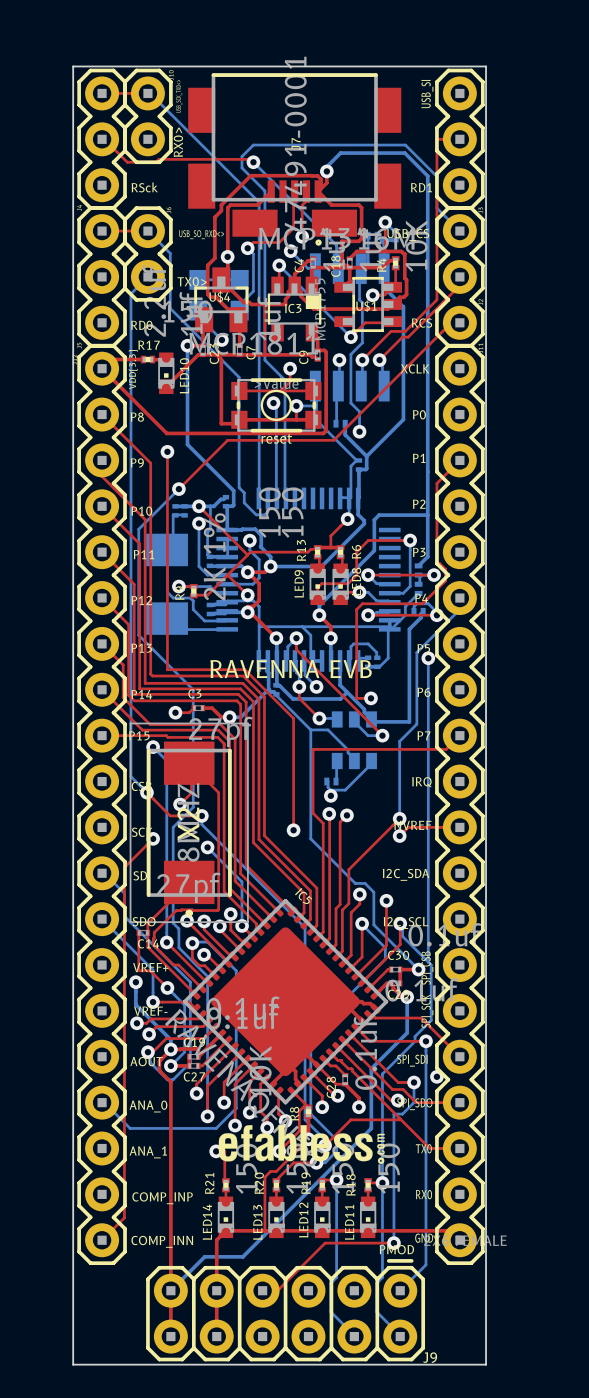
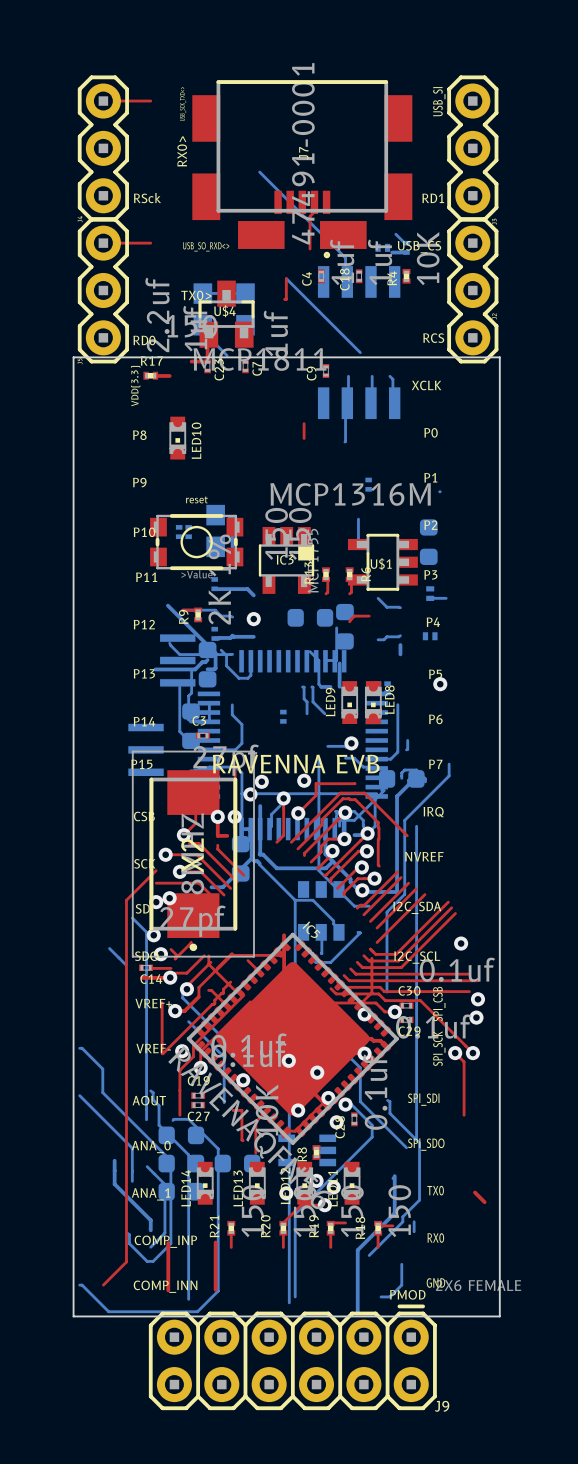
bottom track: (147, 93) (150, 93) (259, 202) (258, 498) -> none
part: (147, 116) -> none
top track: (102, 139) (104, 139) (127, 162) (155, 162) (158, 159) (250, 159) (253, 162) -> none
top track: (459, 139) (436, 139) (436, 299) (405, 331) (391, 331) (362, 360) -> none
via: (253, 162) -> none
top track: (326, 171) (326, 182) (318, 191) (331, 205) (358, 205) (361, 207) (361, 238) (358, 241) (342, 241) (342, 262) (349, 267) (349, 281) (343, 287) -> none
bottom track: (326, 171) (326, 166) (340, 153) (404, 153) (427, 176) (427, 556) (418, 565) -> none
via: (326, 171) -> none
top track: (321, 188) (321, 179) (317, 176) (250, 175) (221, 205) (221, 210) (214, 217) (214, 258) (207, 265) (207, 294) (210, 297) (216, 297) (239, 320) (239, 345) -> none
top track: (271, 191) (257, 205) (230, 205) (227, 207) (227, 273) (221, 280) (243, 302) (251, 304) (285, 304) (288, 291) (294, 285) -> none
top track: (294, 191) (293, 228) (279, 242) (253, 242) (247, 248) -> none
top track: (385, 222) (385, 251) -> none
via: (385, 222) -> none
bottom track: (147, 231) (170, 253) (170, 308) (239, 377) (239, 487) (244, 492) (244, 502) (256, 514) (264, 514) (267, 512) (267, 498) -> none
bottom track: (459, 231) (436, 208) (436, 176) (405, 145) (253, 145) (241, 156) (241, 167) (264, 190) (264, 360) (284, 380) (285, 498) -> none
bottom track: (368, 235) (368, 262) (359, 271) (359, 299) (362, 302) (362, 342) (350, 354) (350, 403) (359, 411) (359, 431) -> none
bottom track: (377, 235) (384, 242) (384, 287) (403, 306) (403, 419) (366, 456) -> none
via: (302, 236) -> none
bottom track: (247, 248) (253, 254) (253, 291) (241, 302) (241, 308) (239, 310) -> none
via: (247, 248) -> none
bottom track: (290, 251) (307, 268) (315, 268) -> none
via: (290, 251) -> none
part: (147, 254) -> none
via: (227, 256) -> none
top track: (313, 258) (308, 260) (294, 274) (294, 285) -> none
top track: (349, 258) (356, 251) (401, 251) (404, 254) (406, 294) (403, 297) (399, 297) (387, 309) (313, 309) (301, 296) (301, 291) (294, 285) -> none
top track: (395, 258) (389, 260) (382, 267) (313, 267) (311, 285) -> none
via: (279, 265) -> none
top track: (395, 267) (395, 284) (384, 294) (372, 295) -> none
bottom track: (147, 276) (130, 293) (130, 776) (146, 792) -> none
top track: (459, 276) (459, 285) (408, 337) (402, 337) (379, 360) -> none
via: (372, 295) -> none
top track: (264, 304) (264, 354) -> none
U$1 position: (368, 304) -> (382, 562)
IC3 position: (294, 309) -> (286, 560)
top track: (392, 321) (365, 322) (350, 337) -> none
top track: (459, 322) (451, 322) (333, 440) (227, 440) (178, 489) -> none
top track: (311, 332) (317, 338) (317, 350) (326, 352) (326, 430) (323, 433) (166, 433) (102, 368) (111, 359) (143, 359) -> none
via: (350, 337) -> none
via: (221, 340) -> none
board edge: (73, 341) (73, 66) (486, 66) (486, 341) -> (73, 357) (499, 357)
bottom track: (187, 345) (187, 444) (233, 490) (233, 505) (225, 506) (227, 506) -> none
via: (187, 345) -> none
top track: (216, 354) (221, 359) (221, 423) (235, 423) (239, 419) (313, 419) -> none
top track: (317, 359) (310, 354) (198, 354) (166, 386) -> none
via: (339, 360) -> none
via: (362, 360) -> none
via: (379, 360) -> none
top track: (290, 368) (290, 381) (280, 390) -> none
via: (290, 368) -> none
LED10 position: (166, 373) -> (177, 438)
bottom track: (315, 386) (316, 420) (356, 460) -> none
top track: (239, 390) (313, 390) -> none
bottom track: (273, 403) (276, 405) (276, 498) -> none
via: (273, 403) -> none
part: (276, 405) -> none
bottom track: (296, 405) (316, 405) -> none
via: (296, 405) -> none
top track: (102, 414) (150, 463) (150, 674) (152, 676) (243, 676) (264, 697) (264, 835) (316, 888) (316, 925) (311, 930) -> none
part: (340, 423) -> none
bottom track: (345, 426) (345, 423) (345, 434) (366, 456) -> none
via: (359, 431) -> none
top track: (167, 451) (167, 669) (244, 669) (293, 718) (293, 830) -> none
via: (167, 451) -> none
bottom track: (366, 456) (366, 468) (358, 469) (358, 514) (364, 520) (364, 523) (321, 566) (270, 566) (270, 556) (260, 546) (261, 535) (255, 529) (227, 530) -> none
top track: (102, 460) (102, 476) (145, 519) (145, 683) (242, 683) (258, 699) (258, 839) (310, 890) (310, 919) (305, 924) -> none
bottom track: (356, 460) (350, 466) (350, 497) (340, 498) -> none
top track: (459, 460) (436, 483) (436, 563) (439, 563) (445, 569) (445, 580) (422, 603) (362, 603) (356, 609) (356, 698) (371, 698) -> none
part footprint: [216, 487, 401, 672] -> [287, 609, 334, 627]
bottom track: (178, 489) (138, 529) (138, 635) (193, 689) (193, 807) (173, 827) (173, 923) (178, 928) (178, 947) (207, 976) (207, 1116) -> none
via: (178, 489) -> none
bottom track: (225, 497) (213, 506) (175, 506) -> (207, 659) (195, 669) (155, 669)
top track: (102, 506) (139, 543) (139, 688) (240, 688) (253, 701) (253, 842) (304, 893) (304, 912) (298, 918) -> none
top track: (198, 506) (247, 555) -> none
via: (198, 506) -> none
bottom track: (210, 506) (207, 555) (209, 556) (227, 557) (227, 539) -> (191, 669) (188, 719) (191, 721) (208, 721) (208, 703)
part: none -> (215, 530)
bottom track: (184, 515) (173, 514) (173, 543) (166, 549) (167, 592) (173, 598) (190, 598) (193, 600) (193, 609) (204, 620) (227, 620) -> none
bottom track: (427, 515) (379, 515) (374, 519) (374, 550) (319, 605) (319, 615) -> none
top track: (347, 519) (330, 535) (330, 547) -> none
via: (347, 519) -> none
part: none -> (196, 542)
part: none -> (428, 542)
bottom track: (198, 523) (198, 566) (207, 575) (227, 575) -> (179, 687) (179, 731) (188, 740) (208, 740)
via: (198, 523) -> none
bottom track: (249, 540) (249, 550) (259, 559) (259, 577) (252, 584) (227, 584) -> (232, 704) (232, 714) (241, 724) (241, 743) (235, 749) (208, 749)
via: (249, 540) -> none
top track: (410, 540) (368, 540) (356, 552) (356, 575) (348, 583) (321, 583) (317, 587) (317, 597) -> none
bottom track: (410, 540) (410, 586) (403, 593) (389, 593) -> (397, 704) (397, 752) (390, 759) (376, 759)
via: (410, 540) -> none
top track: (340, 547) (317, 547) (307, 552) (250, 552) (207, 595) (193, 595) -> none
top track: (102, 552) (134, 584) (134, 693) (238, 694) (246, 702) (246, 865) (292, 911) -> none
top track: (270, 566) (264, 572) (247, 572) (259, 583) (259, 600) (253, 606) (247, 606) (247, 612) (250, 612) (276, 638) (273, 638) -> none
via: (270, 566) -> none
via: (247, 572) -> none
top track: (227, 575) (247, 595) -> none
top track: (368, 575) (434, 575) -> none
via: (368, 575) -> none
bottom track: (419, 575) (418, 584) -> (407, 740) (406, 749)
via: (434, 575) -> none
bottom track: none -> (167, 605) (215, 653) (215, 668) (207, 669) (209, 669)
part: (166, 584) -> none
LED9 position: (317, 584) -> (349, 702)
LED8 position: (340, 584) -> (373, 702)
via: (178, 586) -> none
part: (418, 588) -> none
bottom track: (359, 592) (368, 592) (376, 600) (389, 602) -> (345, 758) (354, 758) (363, 767) (376, 768)
via: (359, 592) -> none
bottom track: (418, 593) (405, 606) (405, 615) (391, 629) (388, 629) (388, 658) (379, 666) (368, 666) -> none
top track: (102, 598) (128, 624) (128, 695) (134, 700) (236, 700) (240, 704) (240, 873) (278, 911) -> none
bottom track: (459, 598) (459, 609) (416, 652) (416, 724) (399, 741) (399, 818) -> (449, 764) (449, 775) (404, 820) (404, 894) (386, 912) (386, 992)
part: none -> (344, 626)
bottom track: none -> (336, 627) (336, 660) (325, 661)
bottom track: (209, 604) (225, 604) (227, 600) (253, 600) (259, 606) (258, 660) (267, 662) -> (191, 771) (206, 770) (209, 767) (236, 767) (241, 772) (241, 829) (250, 830)
bottom track: (413, 611) (414, 606) (416, 603) (428, 603) (436, 612) (436, 615) -> (401, 778) (401, 772) (404, 770) (416, 770) (425, 778) (425, 781)
bottom track: (423, 611) (421, 617) (409, 629) (409, 721) (373, 721) (340, 685) (340, 660) -> (411, 778) (409, 784) (397, 796) (397, 891) (360, 891) (325, 854) (325, 829)
via: (247, 612) -> none
top track: (319, 615) (330, 626) (330, 638) -> none
via: (319, 615) -> none
top track: (368, 615) (436, 615) -> none
via: (368, 615) -> none
via: (436, 615) -> none
bottom track: none -> (221, 650) (226, 655) (226, 665) (238, 678) (247, 678) (250, 675) (250, 661)
bottom track: (259, 626) (389, 626) -> (241, 793) (376, 793)
part: none -> (177, 660)
bottom track: (276, 638) (276, 685) (279, 685) (292, 698) (340, 698) (347, 692) -> (260, 806) (259, 854) (263, 854) (276, 868) (326, 868) (332, 861)
via: (276, 638) -> none
top track: (296, 638) (296, 649) (382, 735) -> none
bottom track: (296, 638) (287, 646) (287, 658) (285, 660) -> (280, 805) (271, 814) (271, 826) (269, 829)
via: (296, 638) -> none
via: (330, 638) -> none
part: none -> (207, 664)
top track: (102, 643) (123, 665) (123, 697) (150, 724) (220, 724) (235, 739) (235, 881) (272, 918) -> none
bottom track: (377, 657) (376, 652) (368, 643) (353, 643) (350, 646) (349, 660) -> none
bottom track: (428, 658) (428, 962) -> (416, 826) (416, 1140)
bottom track: (267, 660) (268, 689) -> (250, 829) (251, 858)
text position: RAVENNA EVB (291, 669) -> RAVENNA EVB (296, 764)
top track: (299, 686) (299, 698) (319, 718) -> none
via: (299, 686) -> none
via: (316, 686) -> none
top track: (102, 689) (142, 730) (218, 730) (229, 741) -> none
bottom track: (268, 689) (240, 717) (229, 717) -> (251, 858) (222, 887) (211, 887)
bottom track: (268, 689) (274, 692) (310, 729) (327, 729) (348, 749) (354, 761) -> none
part: none -> (191, 726)
via: (371, 698) -> none
top track: (193, 708) (189, 712) (175, 712) -> none
top track: (202, 708) (212, 708) (221, 717) (229, 717) -> none
via: (175, 712) -> none
via: none -> (351, 743)
via: (229, 717) -> none
part: none -> (292, 745)
via: (319, 718) -> none
bottom track: (354, 719) (368, 735) (382, 735) -> none
part: none -> (146, 749)
top track: (102, 735) (217, 737) (224, 743) (224, 891) (256, 923) (256, 927) (259, 930) -> none
via: (382, 735) -> none
top track: (459, 735) (446, 749) (313, 749) (313, 813) (323, 823) (323, 932) (318, 937) -> none
part position: (354, 740) -> (321, 910)
bottom track: (153, 747) (166, 760) (166, 942) -> (132, 918) (146, 932) (146, 1119)
via: (153, 747) -> none
part: none -> (401, 778)
via: none -> (304, 780)
via: none -> (261, 781)
top track: none -> (355, 783) (316, 783) (316, 795) (298, 813)
bottom track: (337, 761) (336, 781) -> (363, 825) (363, 820) (354, 811) (345, 811)
top track: (189, 763) (218, 792) (218, 909) (176, 910) (154, 932) (153, 944) (173, 965) (178, 965) (201, 988) -> none
via: none -> (250, 794)
bottom track: none -> (376, 796) (375, 796) (375, 826) (366, 835) (354, 835)
top track: none -> (283, 798) (283, 835) (276, 842)
via: none -> (283, 798)
part: (331, 781) -> none
top track: none -> (345, 812) (304, 855)
via: none -> (345, 812)
via: none -> (298, 813)
top track: none -> (217, 816) (217, 835) (227, 835)
via: none -> (217, 816)
via: none -> (234, 816)
top track: (146, 792) (170, 815) (201, 815) -> none
via: (146, 792) -> none
via: (330, 795) -> none
top track: none -> (367, 833) (324, 875)
via: none -> (367, 833)
part: (102, 804) -> none
part: (459, 804) -> none
top track: none -> (407, 835) (364, 793) (340, 793) (291, 842)
top track: none -> (344, 839) (328, 839) (321, 846) (321, 852) (311, 862)
via: none -> (344, 839)
top track: none -> (189, 843) (198, 843) (237, 881)
top track: (329, 813) (329, 938) (324, 943) -> none
via: (329, 813) -> none
top track: none -> (217, 845) (217, 849) (243, 875)
bottom track: (201, 815) (201, 824) (305, 927) (305, 1119) (325, 1139) (325, 1145) -> none
via: (201, 815) -> none
via: (346, 815) -> none
top track: (346, 816) (340, 822) (340, 904) (336, 908) (336, 944) (330, 949) -> none
top track: none -> (297, 848) (321, 824) (321, 819) (342, 798) (355, 799) (378, 822) (379, 866)
top track: (399, 818) (348, 869) (348, 903) (342, 910) (342, 951) (337, 956) -> none
via: (399, 818) -> none
top track: none -> (332, 851) (332, 853) (317, 868)
via: none -> (332, 851)
top track: none -> (366, 851) (358, 851) (330, 878) (330, 881)
via: none -> (366, 851)
top track: none -> (165, 854) (196, 854) (230, 888)
via: none -> (165, 854)
part: none -> (240, 858)
bottom track: none -> (251, 858) (257, 861) (295, 900)
top track: (459, 827) (408, 827) (399, 836) -> none
via: (293, 830) -> none
top track: none -> (361, 867) (358, 867) (337, 888)
via: none -> (361, 867)
via: (399, 836) -> none
via: (153, 838) -> none
top track: none -> (179, 871) (200, 871) (224, 895)
via: none -> (179, 871)
top track: none -> (397, 871) (364, 905) (360, 905) (357, 908)
top track: none -> (401, 877) (363, 914)
top track: none -> (374, 878) (357, 878) (344, 892) (344, 895)
via: none -> (374, 878)
bottom track: (207, 847) (241, 881) (242, 925) -> (188, 1021) (224, 1057) (224, 1102)
via: (207, 847) -> none
top track: none -> (156, 883) (199, 883) (217, 901)
top track: none -> (408, 883) (370, 921)
top track: none -> (416, 888) (377, 928)
via: none -> (362, 890)
top track: none -> (424, 894) (377, 942)
via: none -> (169, 898)
bottom track: none -> (295, 900) (312, 900) (333, 921) (340, 932)
bottom track: none -> (295, 900) (295, 1012) (341, 1058) (351, 1058) (360, 1067) (360, 1101) (406, 1147)
via: none -> (156, 902)
top track: none -> (448, 902) (396, 954) (375, 954) (370, 949)
bottom track: (102, 873) (104, 873) (124, 893) (124, 916) (190, 982) (190, 1062) (173, 1079) -> (79, 1285) (82, 1285) (108, 1311) (197, 1311) (218, 1291) (218, 1148) (188, 1119) (176, 1119)
bottom track: (345, 873) (355, 883) (365, 883) (373, 892) (373, 924) (418, 969) -> (354, 906) (369, 906)
top track: none -> (451, 907) (398, 960) (369, 960) (363, 955)
top track: none -> (455, 913) (401, 967) (362, 967) (357, 962)
top track: (189, 882) (147, 923) (147, 947) (195, 994) -> none
top track: (229, 888) (265, 924) -> none
top track: (359, 894) (359, 904) (351, 912) (351, 955) (343, 962) -> none
via: (359, 894) -> none
bottom track: none -> (322, 932) (321, 953)
bottom track: none -> (357, 932) (360, 932) (330, 962) (315, 962) (311, 953)
top track: (386, 900) (386, 945) (356, 975) -> none
via: (386, 900) -> none
via: none -> (153, 935)
top track: none -> (191, 942) (175, 958) (176, 955) (171, 949)
via: none -> (461, 943)
bottom track: none -> (109, 948) (126, 965)
top track: (230, 914) (230, 930) (244, 943) (246, 943) -> none
via: (230, 914) -> none
bottom track: (102, 919) (153, 970) (153, 1002) -> (79, 1095) (132, 1148) (132, 1181)
via: none -> (160, 954)
top track: (187, 920) (227, 962) -> none
via: (187, 920) -> none
top track: none -> (204, 955) (186, 973) (175, 973)
via: (204, 921) -> none
bottom track: (362, 923) (385, 947) (385, 959) (310, 1033) (310, 1114) (336, 1139) (336, 1151) (325, 1162) (316, 1162) -> none
via: (362, 923) -> none
top track: (400, 923) (400, 944) (362, 981) -> none
bottom track: (400, 923) (402, 924) (402, 936) (431, 965) (431, 1020) (415, 1036) (415, 1041) (382, 1073) (382, 1277) (376, 1283) (376, 1311) (400, 1336) -> none
via: (400, 923) -> none
via: (242, 925) -> none
top track: (219, 926) (219, 929) (240, 949) -> none
via: (219, 926) -> none
top track: none -> (210, 962) (186, 986) (186, 989)
top track: (138, 932) (138, 970) (150, 970) (167, 987) -> none
top track: none -> (150, 968) (171, 968)
top track: none -> (217, 968) (231, 954) (283, 955) (284, 935) (284, 1013) (282, 1015) (282, 1022) (276, 1028)
top track: none -> (217, 968) (198, 987) (198, 996) (184, 1011) (175, 1011)
top track: none -> (350, 968) (355, 974) (468, 974)
top track: none -> (344, 975) (349, 980) (477, 980)
top track: none -> (142, 977) (165, 977)
top track: (166, 942) (208, 981) -> none
top track: (192, 943) (192, 958) (199, 965) (204, 965) (214, 975) -> none
bottom track: (192, 943) (207, 942) (236, 970) (236, 1108) (216, 1128) (130, 1128) (104, 1102) (102, 1102) -> none
via position: (192, 943) -> (186, 989)
top track: none -> (230, 982) (223, 989) (223, 993) (214, 1000) (214, 1003) (162, 1053) (162, 1002)
top track: none -> (337, 982) (342, 987) (380, 987) (384, 991) (469, 991)
bottom track: none -> (182, 989) (182, 997) (289, 1104) (289, 1302)
top track: none -> (330, 988) (336, 993) (378, 993) (385, 1000) (420, 1000) (472, 1053)
via: (204, 954) -> none
top track: none -> (243, 995) (193, 1045) (193, 1056) (179, 1070) (179, 1115)
top track: none -> (324, 995) (332, 1003) (375, 1003) (384, 1011) (394, 1011)
via: none -> (477, 999)
top track: none -> (250, 1001) (200, 1051) (200, 1067)
top track: (391, 969) (387, 969) (369, 988) -> none
top track: (418, 969) (400, 969) (400, 983) -> none
via: (418, 969) -> none
via: none -> (394, 1011)
via: none -> (364, 1014)
via: none -> (476, 1017)
bottom track: (135, 982) (135, 1004) (170, 1039) (170, 1048) -> (114, 1160) (114, 1184) (150, 1220) (150, 1230) (150, 1228)
via: (135, 982) -> none
bottom track: (167, 987) (184, 1005) (184, 1052) (170, 1065) -> (147, 1166) (164, 1184) (164, 1233) (150, 1247)
via position: (167, 987) -> (175, 1011)
top track: (375, 994) (386, 983) (391, 983) (402, 997) (407, 997) -> none
via: (407, 997) -> none
bottom track: (405, 999) (407, 997) (407, 1032) (371, 1068) (371, 1128) (242, 1256) (204, 1256) (170, 1290) (173, 1288) -> none
top track: (153, 1002) (188, 1002) (195, 1008) -> none
via: (153, 1002) -> none
top track: (349, 1008) (362, 1021) -> none
bottom track: none -> (79, 1048) (82, 1048) (102, 1069) (102, 1092) (170, 1160) (170, 1243) (153, 1261) (147, 1261) (129, 1243) (129, 1234) (127, 1233)
via: none -> (182, 1051)
top track: (201, 1015) (198, 1018) (150, 1018) (146, 1023) (136, 1023) -> none
top track: (369, 1015) (375, 1018) (421, 1018) (459, 1056) -> none
top track: none -> (455, 1053) (464, 1061) (464, 1115)
via: none -> (455, 1053)
via: none -> (472, 1053)
via: none -> (364, 1053)
top track: (208, 1021) (203, 1026) (156, 1026) (149, 1034) -> none
via: (136, 1023) -> none
via: none -> (288, 1060)
top track: (214, 1027) (204, 1038) (166, 1038) (152, 1052) (147, 1052) -> none
top track: (356, 1027) (369, 1041) (425, 1041) -> none
via: none -> (200, 1067)
via: (149, 1034) -> none
top track: (221, 1034) (198, 1056) -> none
via: none -> (317, 1072)
top track: (350, 1034) (398, 1082) (414, 1082) -> none
top track: (227, 1040) (202, 1065) (198, 1065) -> none
top track: (343, 1040) (392, 1089) (403, 1089) (416, 1102) (459, 1102) -> none
via: none -> (243, 1080)
bottom track: (425, 1041) (425, 1264) (400, 1290) -> none
via: (425, 1041) -> none
top track: (233, 1047) (196, 1084) (196, 1093) -> none
top track: (337, 1047) (391, 1100) (397, 1100) -> none
top track: (170, 1049) (197, 1049) (198, 1056) -> none
top track: (170, 1049) (159, 1061) (159, 1070) (170, 1082) (170, 1336) -> none
via: (170, 1049) -> none
via: (147, 1052) -> none
top track: (240, 1053) (207, 1086) (207, 1116) -> none
top track: (330, 1053) (337, 1060) (341, 1060) (348, 1068) (351, 1068) (429, 1148) (459, 1148) -> none
top track: (189, 1056) (189, 1065) (170, 1065) -> none
top track: (246, 1059) (224, 1082) (224, 1102) -> none
top track: none -> (328, 1098) (295, 1131) (289, 1131) (283, 1137)
via: none -> (328, 1098)
top track: (324, 1059) (330, 1065) (335, 1065) (345, 1075) -> none
bottom track: (150, 1060) (167, 1079) (170, 1079) -> (172, 1120) (173, 1119)
bottom track: none -> (153, 1099) (159, 1105) (159, 1125) (188, 1154) (188, 1299)
bottom track: none -> (348, 1100) (372, 1125) (372, 1137) (295, 1214) (295, 1296)
bottom track: none -> (387, 1100) (389, 1101) (389, 1113) (419, 1143) (419, 1200) (402, 1216) (402, 1221) (369, 1255)
via: (170, 1065) -> none
via: none -> (345, 1104)
top track: (253, 1066) (235, 1084) (235, 1125) -> none
top track: (318, 1066) (336, 1084) (345, 1084) (358, 1097) (358, 1107) -> none
via: none -> (298, 1110)
top track: (311, 1072) (334, 1095) (337, 1095) -> none
via: (436, 1076) -> none
top track: (265, 1078) (260, 1084) (260, 1111) (267, 1118) (267, 1127) (262, 1123) -> none
top track: (305, 1078) (322, 1095) (322, 1107) -> none
bottom track: (414, 1082) (414, 1102) (402, 1114) (393, 1114) (393, 1243) -> none
via: (414, 1082) -> none
top track: (272, 1085) (290, 1065) (295, 1071) (295, 1079) (298, 1085) -> none
top track: (278, 1091) (278, 1113) (285, 1120) -> none
top track: (292, 1091) (308, 1107) (305, 1105) (299, 1111) (299, 1131) (279, 1151) -> none
via: (196, 1093) -> none
part: none -> (181, 1135)
via position: (337, 1095) -> (336, 1122)
via: (397, 1100) -> none
via: (224, 1102) -> none
via: (322, 1107) -> none
via: (358, 1107) -> none
part: none -> (307, 1150)
via: (249, 1112) -> none
via: (207, 1116) -> none
top track: (308, 1116) (308, 1139) (276, 1171) (270, 1171) (264, 1177) (264, 1231) -> none
top track: (400, 1119) (350, 1119) (325, 1145) -> none
via: (285, 1120) -> none
part: none -> (181, 1163)
part: none -> (237, 1163)
drawing: [218, 1125, 385, 1165] -> none
via: (235, 1125) -> none
via: (267, 1127) -> none
bottom track: none -> (392, 1178) (394, 1176) (394, 1213) (357, 1250) (357, 1311)
part: none -> (181, 1191)
top track: none -> (474, 1192) (484, 1202)
top track: (216, 1151) (224, 1151) (225, 1180) -> (233, 1110) (241, 1110) (243, 1140)
via: (216, 1151) -> none
bottom track: none -> (414, 1221) (414, 1231)
bottom track: (336, 1180) (336, 1277) (330, 1283) (330, 1311) (354, 1336) -> none
via: (336, 1180) -> none
via: (382, 1182) -> none
top track: none -> (215, 1242) (215, 1289)
top track: none -> (168, 1243) (168, 1290)
LED14 position: (225, 1217) -> (205, 1183)
LED13 position: (276, 1217) -> (257, 1183)
LED12 position: (322, 1217) -> (304, 1183)
LED11 position: (368, 1217) -> (352, 1183)
bottom track: none -> (401, 1264) (401, 1285) (389, 1296) (381, 1296)
top track: (459, 1240) (450, 1230) (225, 1230) (216, 1240) (216, 1336) -> none
top track: (393, 1243) (325, 1243) (279, 1288) (262, 1290) -> none
via: (393, 1243) -> none
board edge: (73, 1270) (73, 1364) (486, 1364) (486, 1270) -> (73, 1316) (499, 1316)

